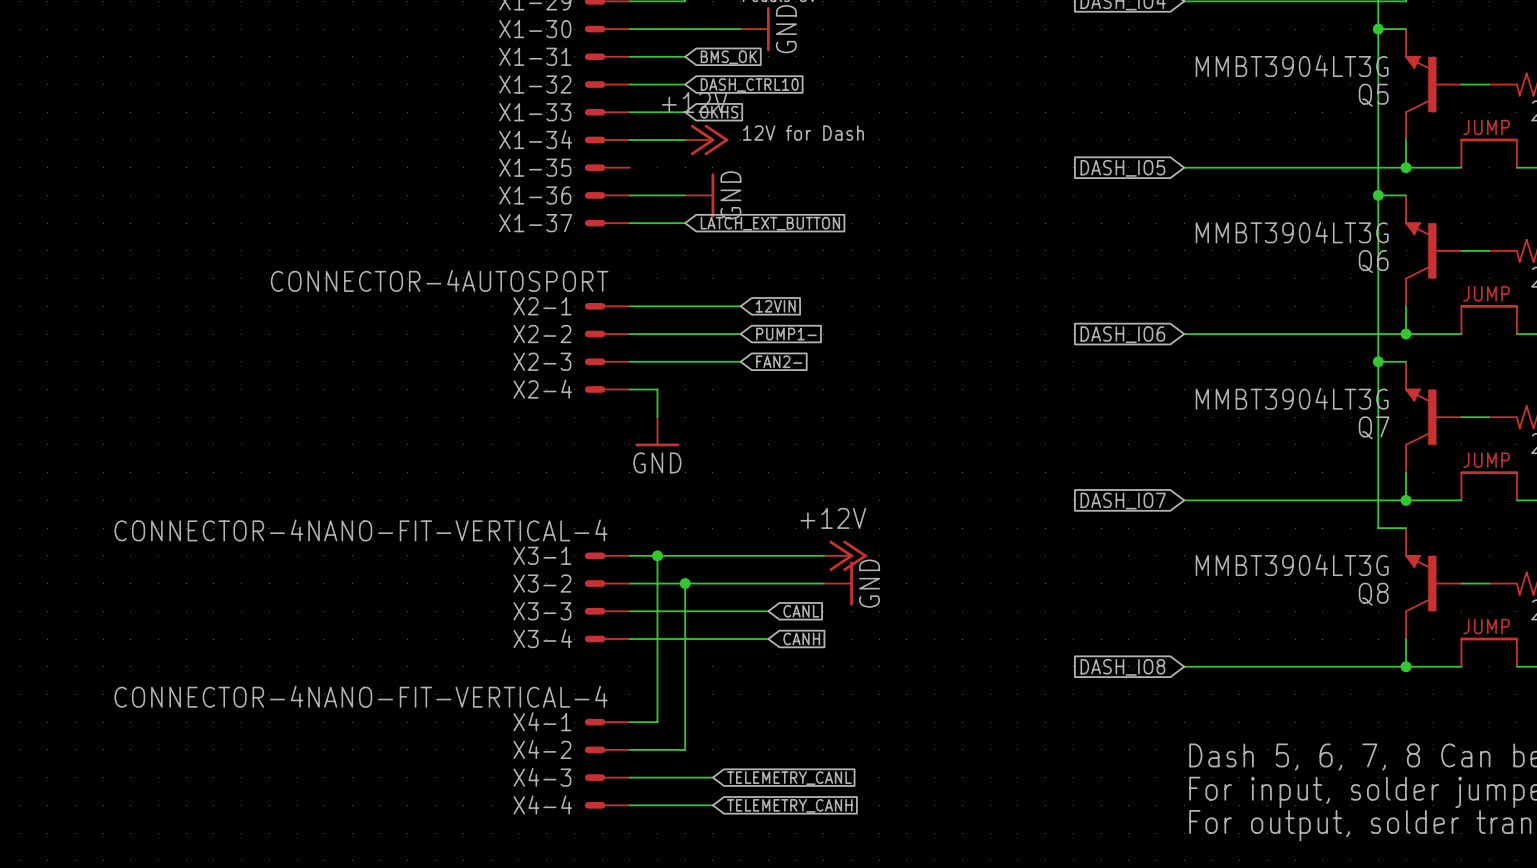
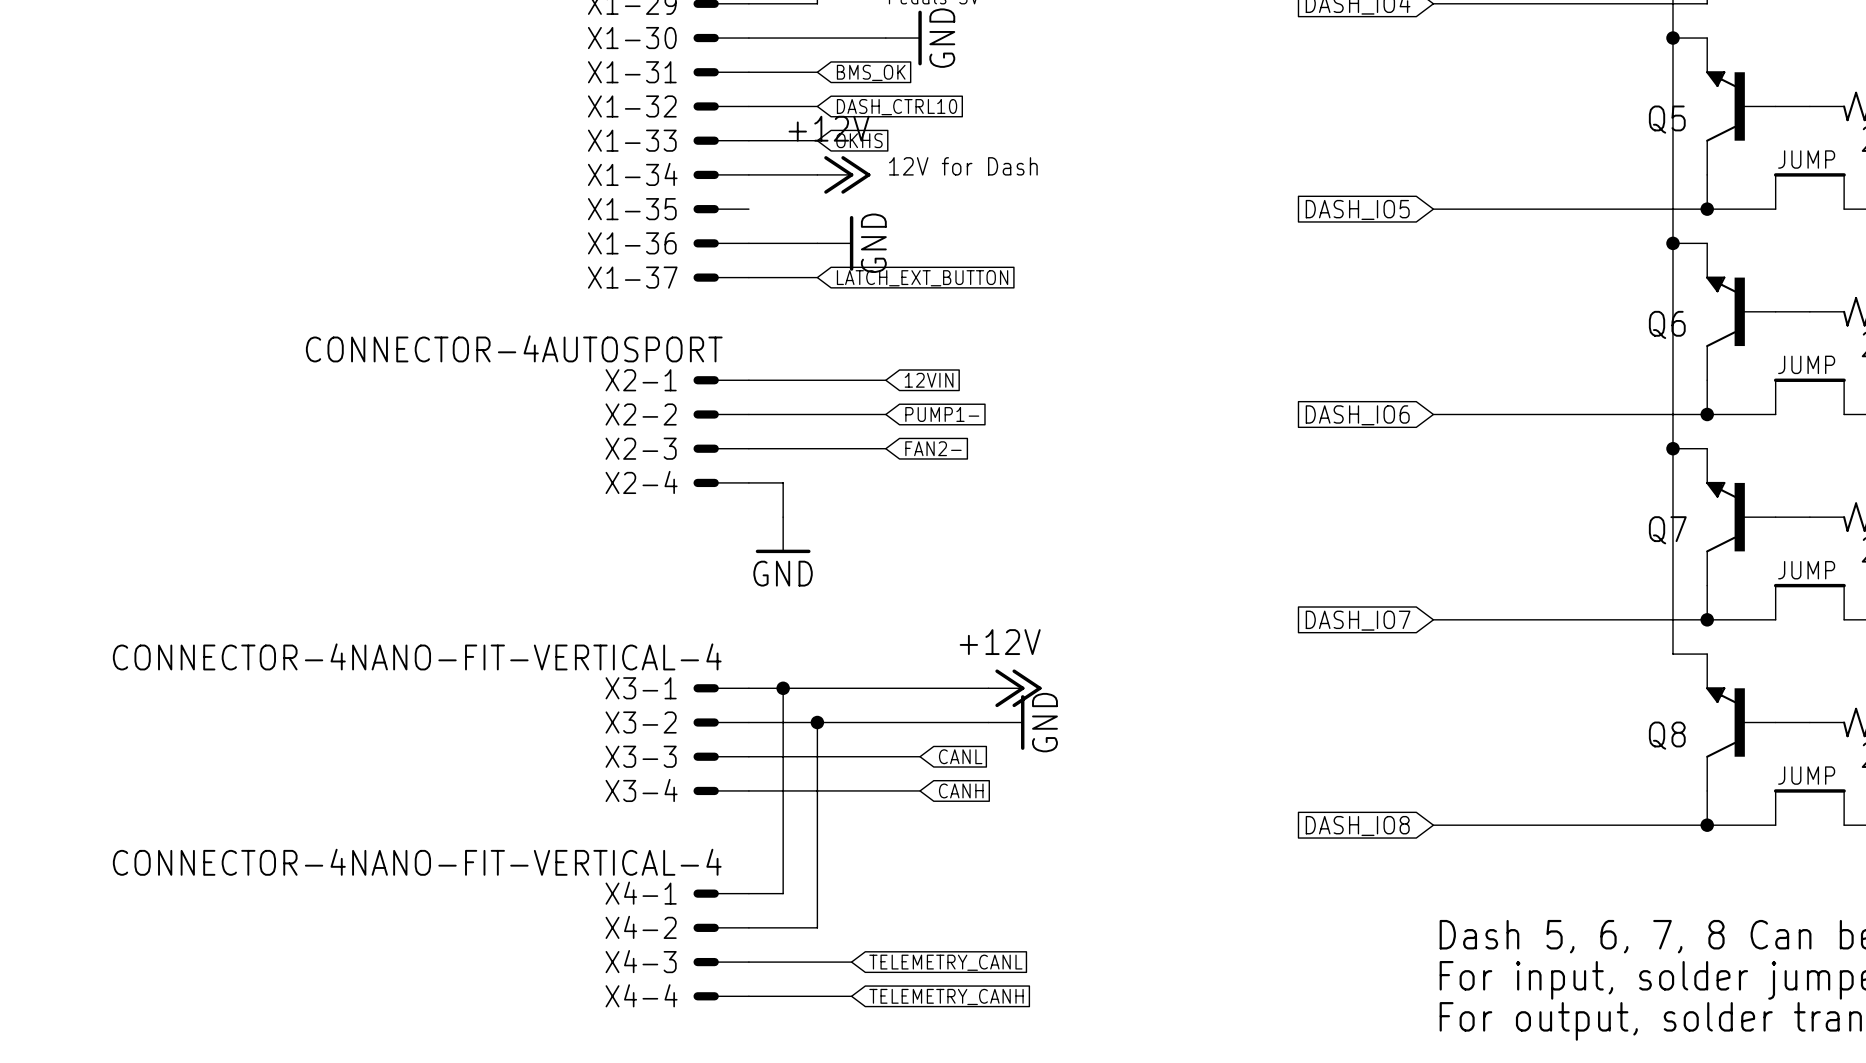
Q5 value: MMBT3904LT3G (1292, 66) -> none
Q6 value: MMBT3904LT3G (1292, 232) -> none
Q7 value: MMBT3904LT3G (1292, 398) -> none
Q8 value: MMBT3904LT3G (1292, 565) -> none

